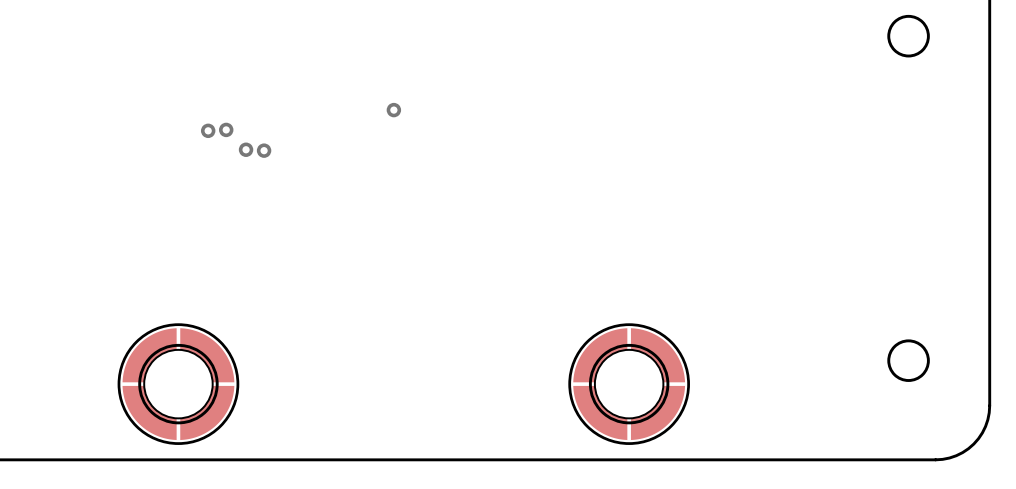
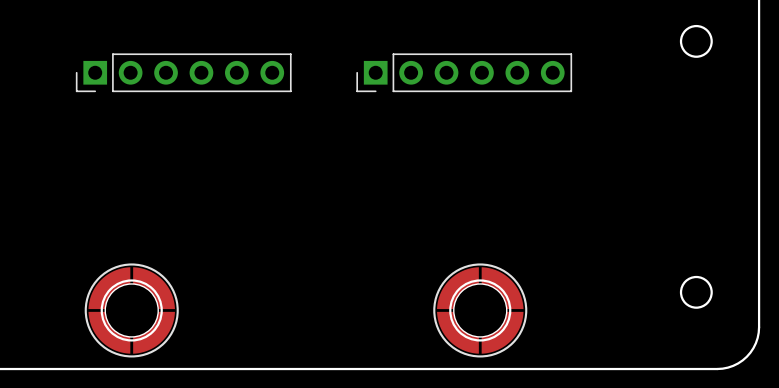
part: none -> (183, 72)
part: none -> (464, 72)
via: (393, 110) -> none
via: (226, 129) -> none
via: (208, 130) -> none
via: (246, 149) -> none
via: (264, 150) -> none

